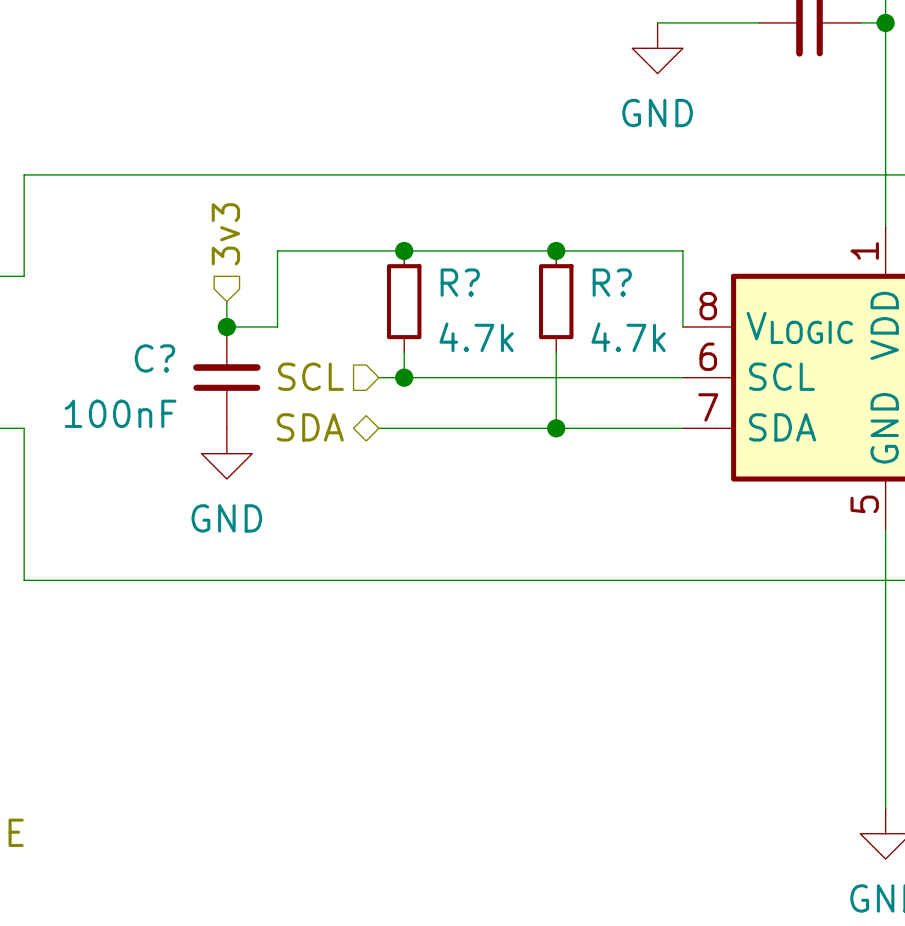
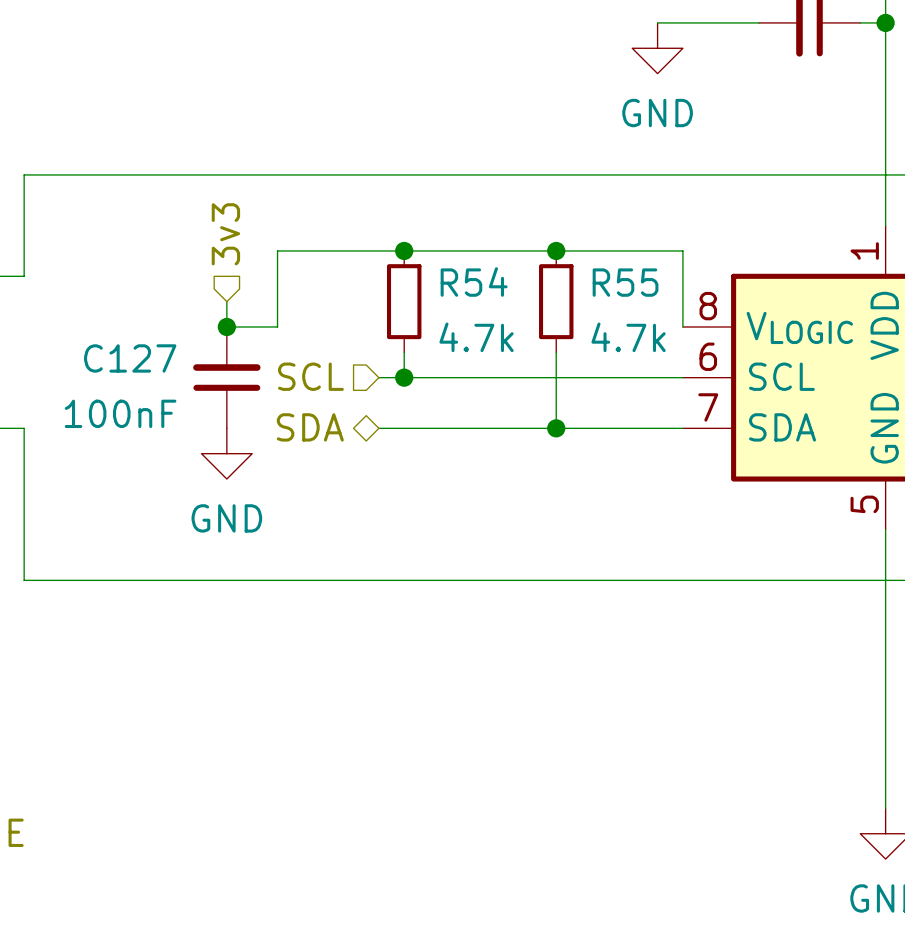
R? name: R? (460, 282) -> R54 (474, 281)
R? name: R? (612, 282) -> R55 (625, 282)
C? name: C? (154, 358) -> C127 (130, 358)

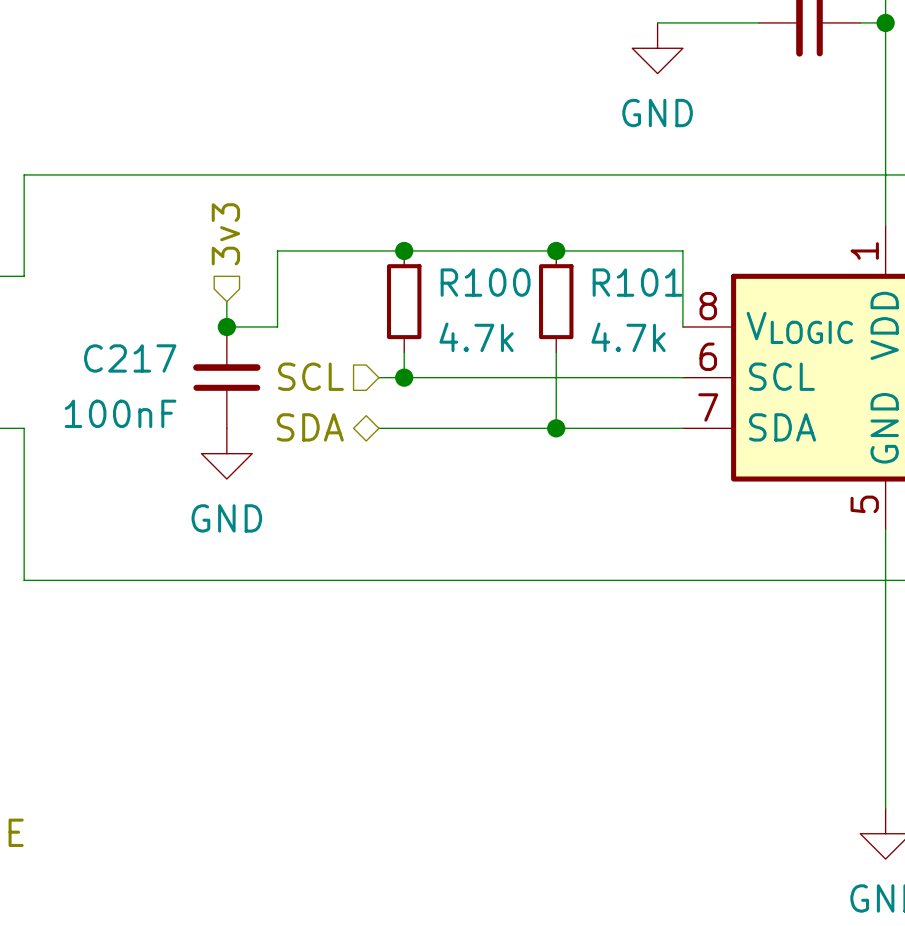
R54 name: R54 (474, 281) -> R100 (485, 282)
R55 name: R55 (625, 282) -> R101 (637, 282)
C127 name: C127 (130, 358) -> C217 (130, 358)

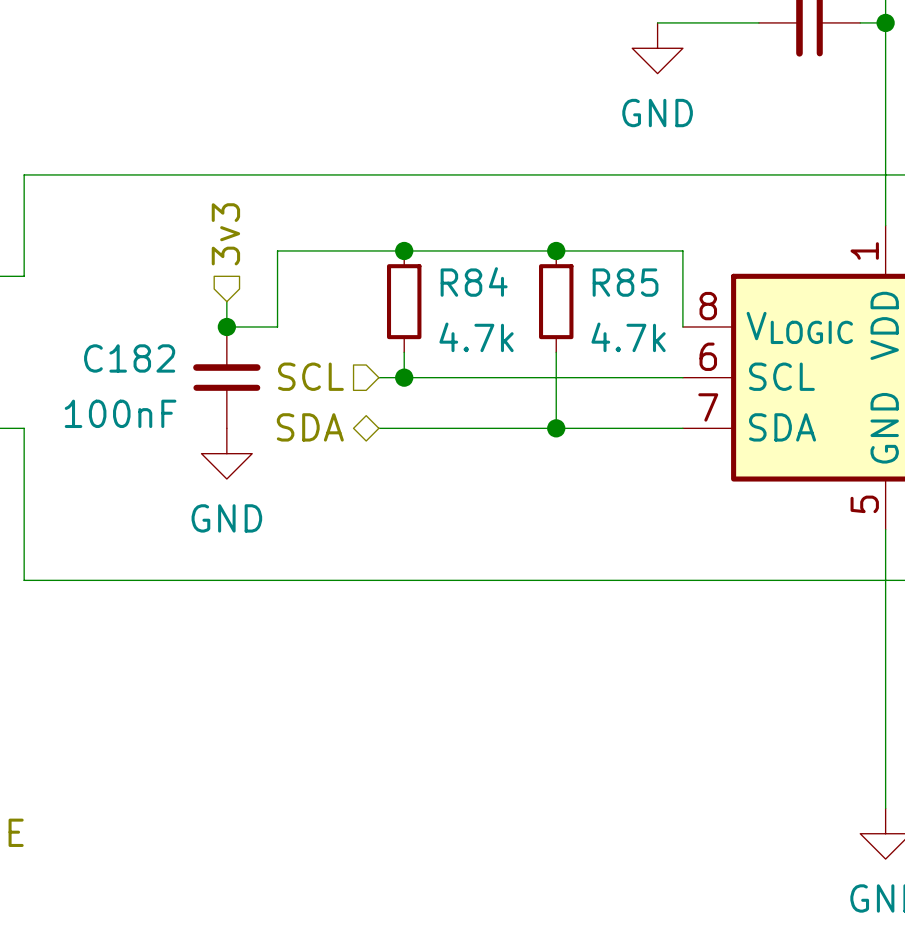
R100 name: R100 (485, 282) -> R84 (474, 281)
R101 name: R101 (637, 282) -> R85 (625, 282)
C217 name: C217 (130, 358) -> C182 (129, 358)

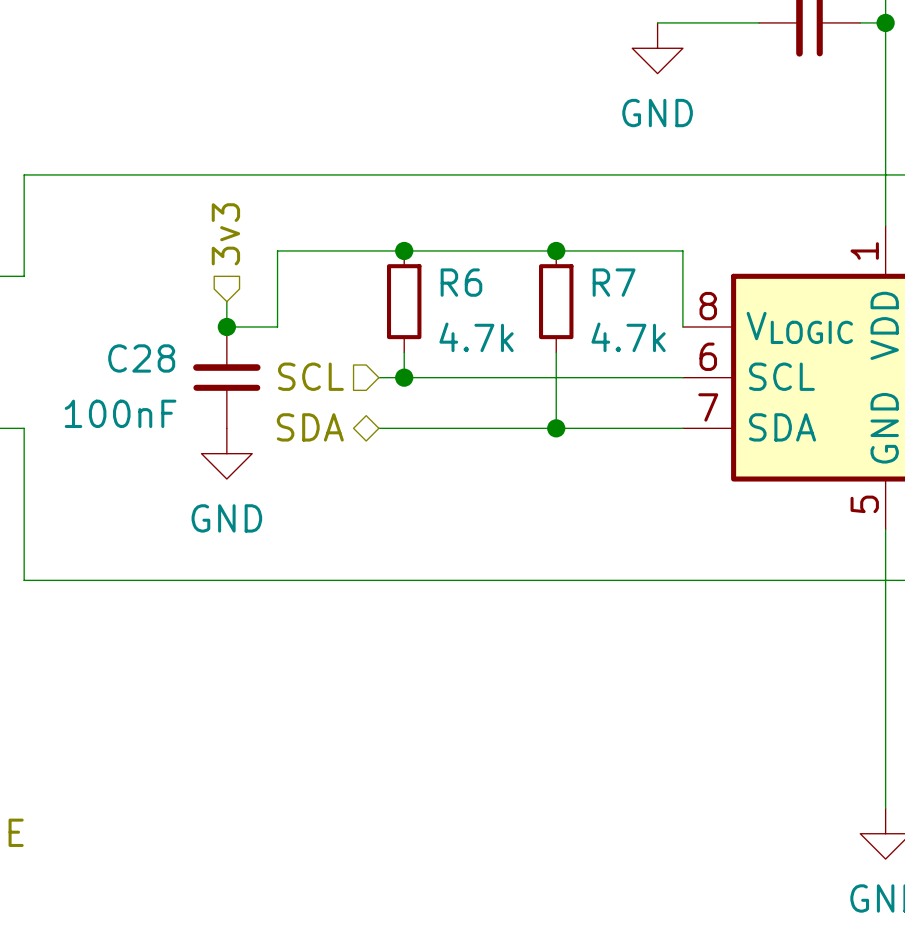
R84 name: R84 (474, 281) -> R6 (461, 282)
R85 name: R85 (625, 282) -> R7 (614, 282)
C182 name: C182 (129, 358) -> C28 (141, 358)

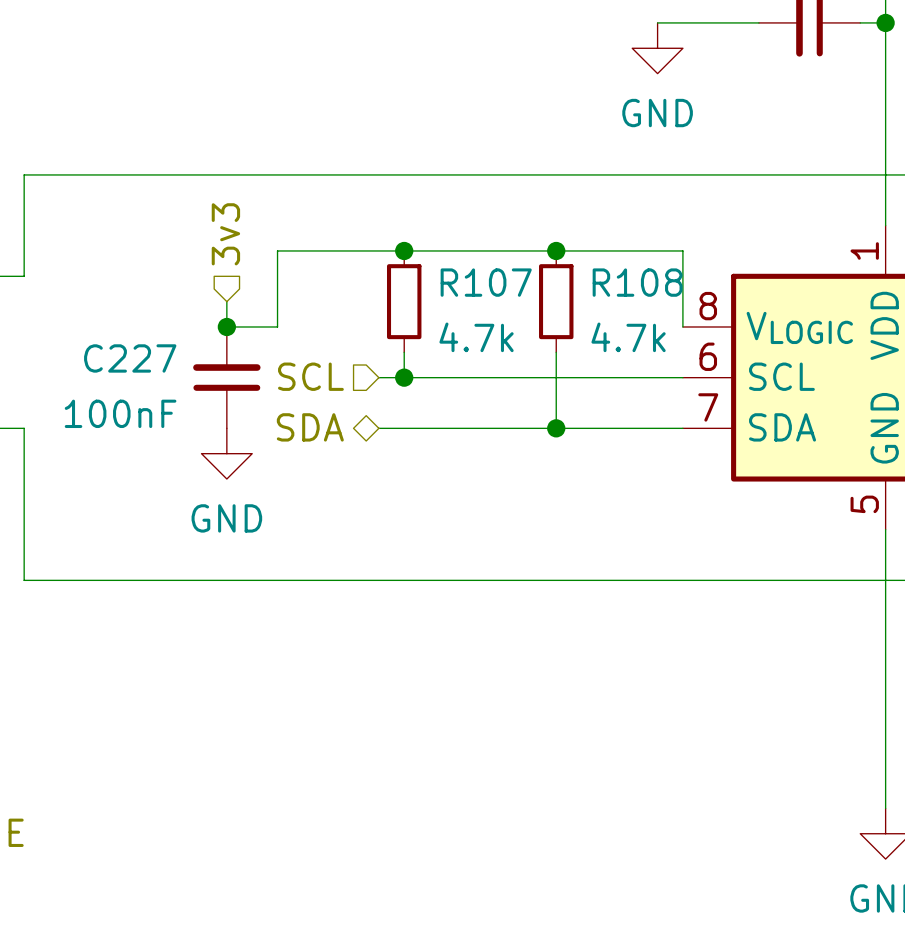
R6 name: R6 (461, 282) -> R107 (486, 282)
R7 name: R7 (614, 282) -> R108 (637, 282)
C28 name: C28 (141, 358) -> C227 (130, 358)

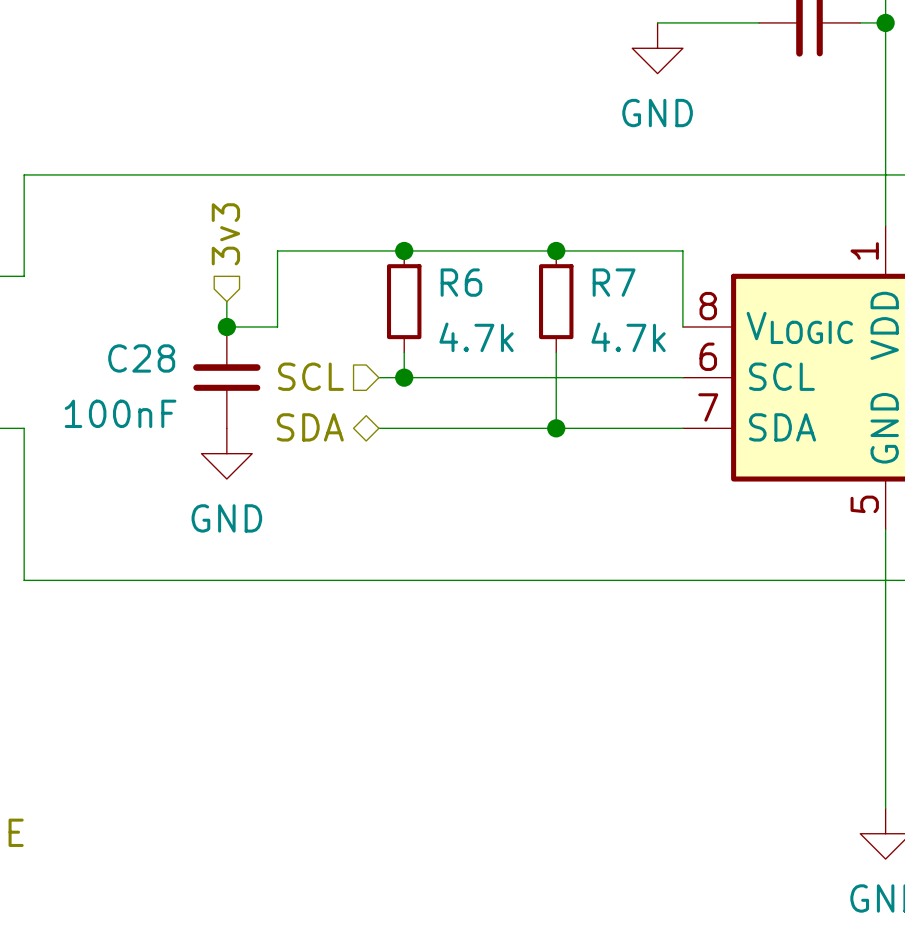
R107 name: R107 (486, 282) -> R6 (461, 282)
R108 name: R108 (637, 282) -> R7 (614, 282)
C227 name: C227 (130, 358) -> C28 (141, 358)

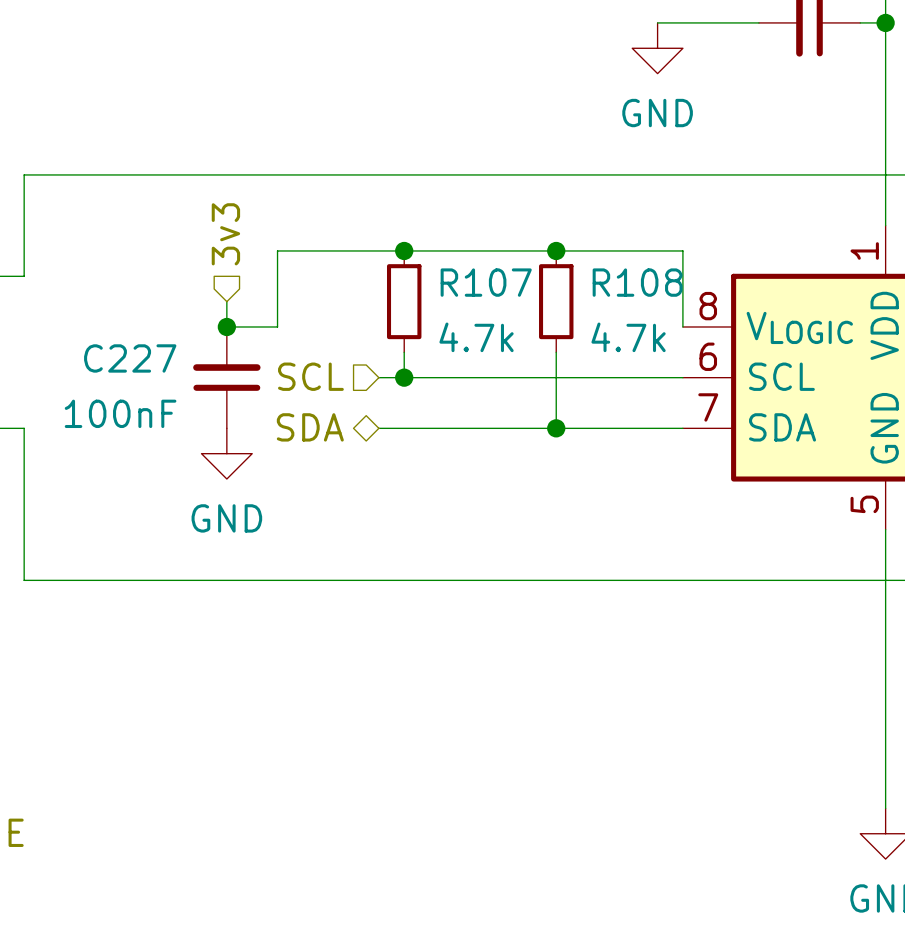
R6 name: R6 (461, 282) -> R107 (486, 282)
R7 name: R7 (614, 282) -> R108 (637, 282)
C28 name: C28 (141, 358) -> C227 (130, 358)

